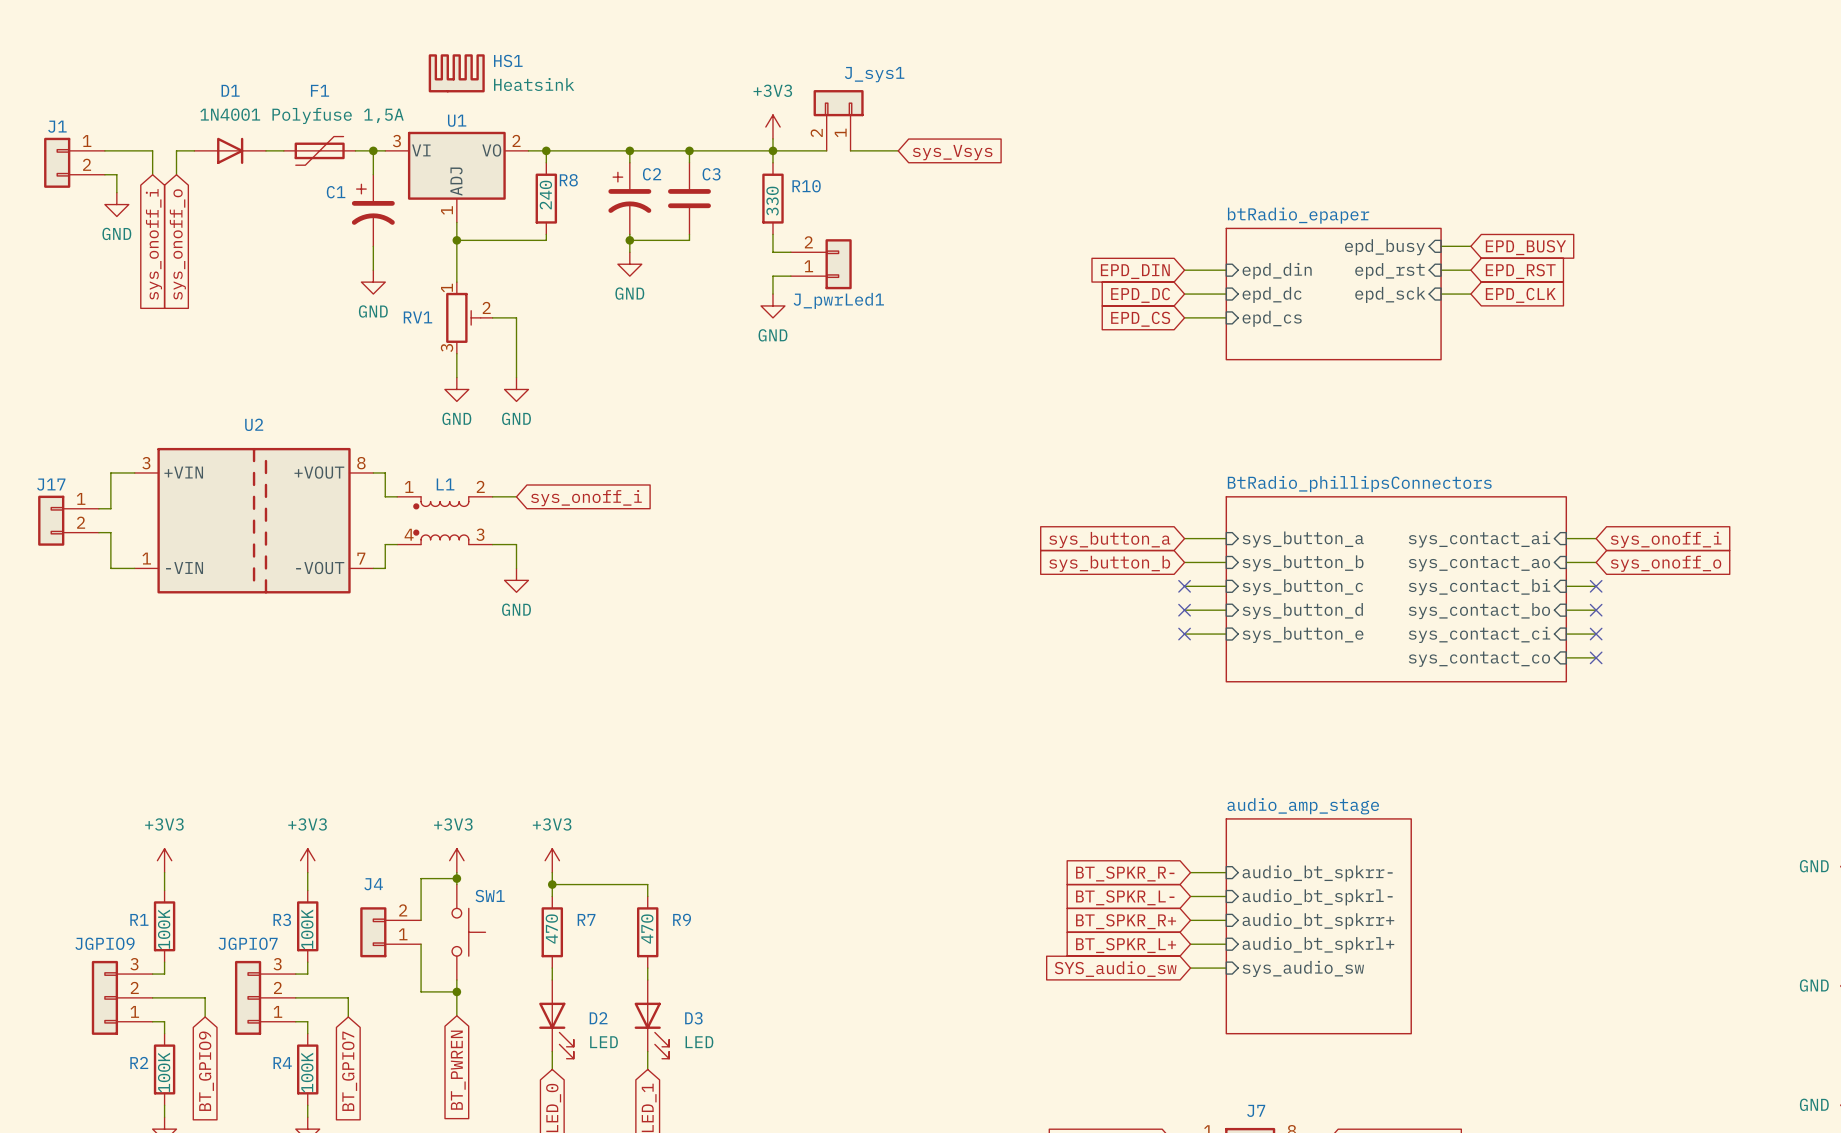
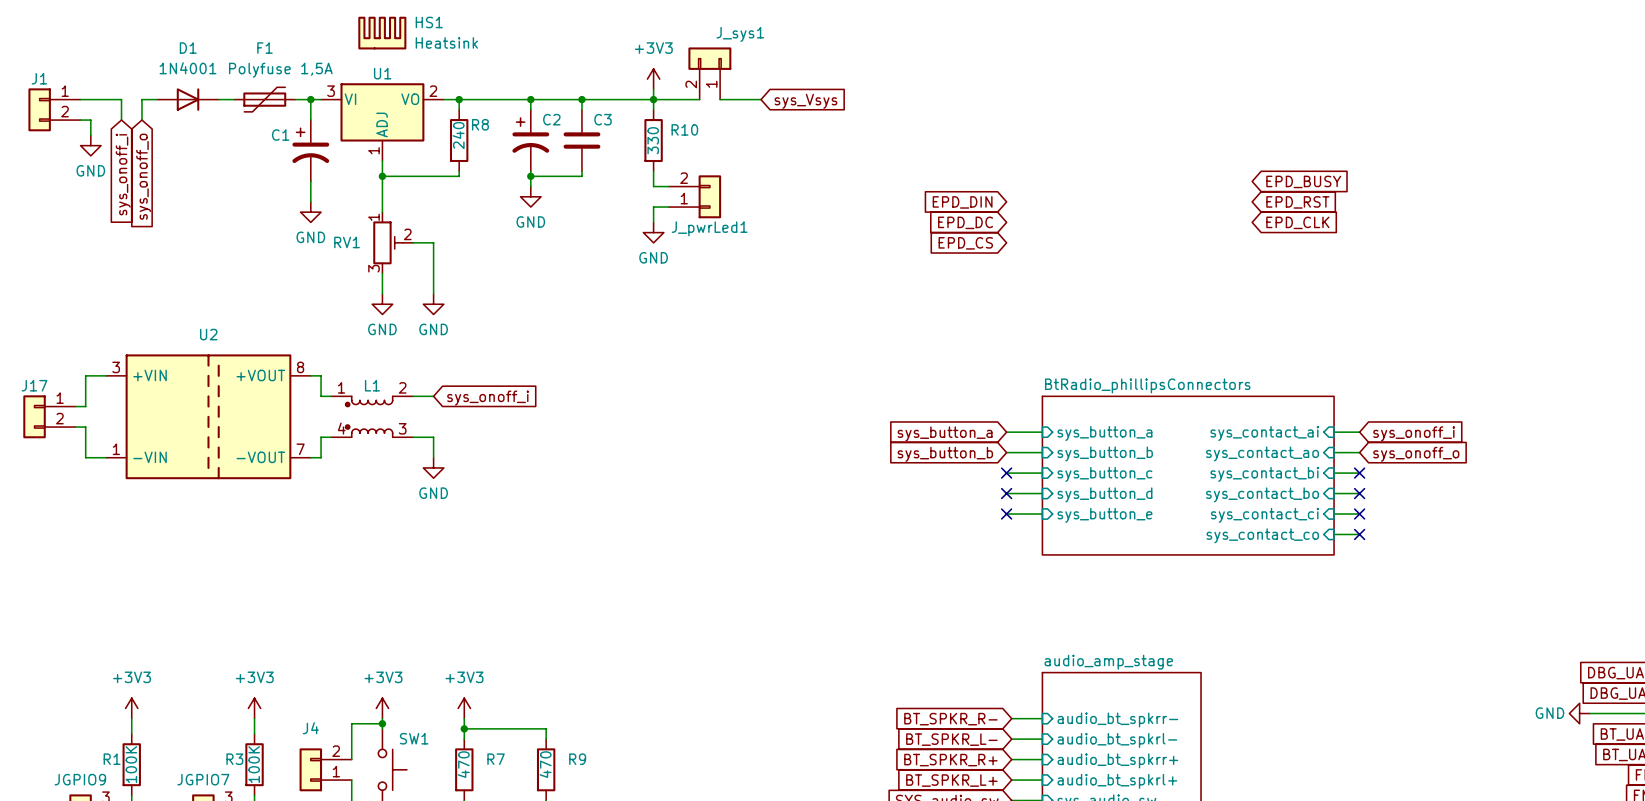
wire: (1441, 246) (1470, 246) -> none
sheet pin: epd_busy (1385, 247) -> none
wire: (1184, 270) (1226, 270) -> none
wire: (1441, 270) (1470, 270) -> none
sheet pin: epd_din (1277, 271) -> none
sheet pin: epd_rst (1389, 271) -> none
wire: (1184, 294) (1226, 294) -> none
sheet pin: epd_dc (1272, 294) -> none
sheet btRadio_epaper: (1333, 294) -> none
sheet pin: epd_sck (1390, 294) -> none
wire: (1441, 294) (1470, 294) -> none
wire: (1184, 317) (1226, 317) -> none
sheet pin: epd_cs (1272, 318) -> none

